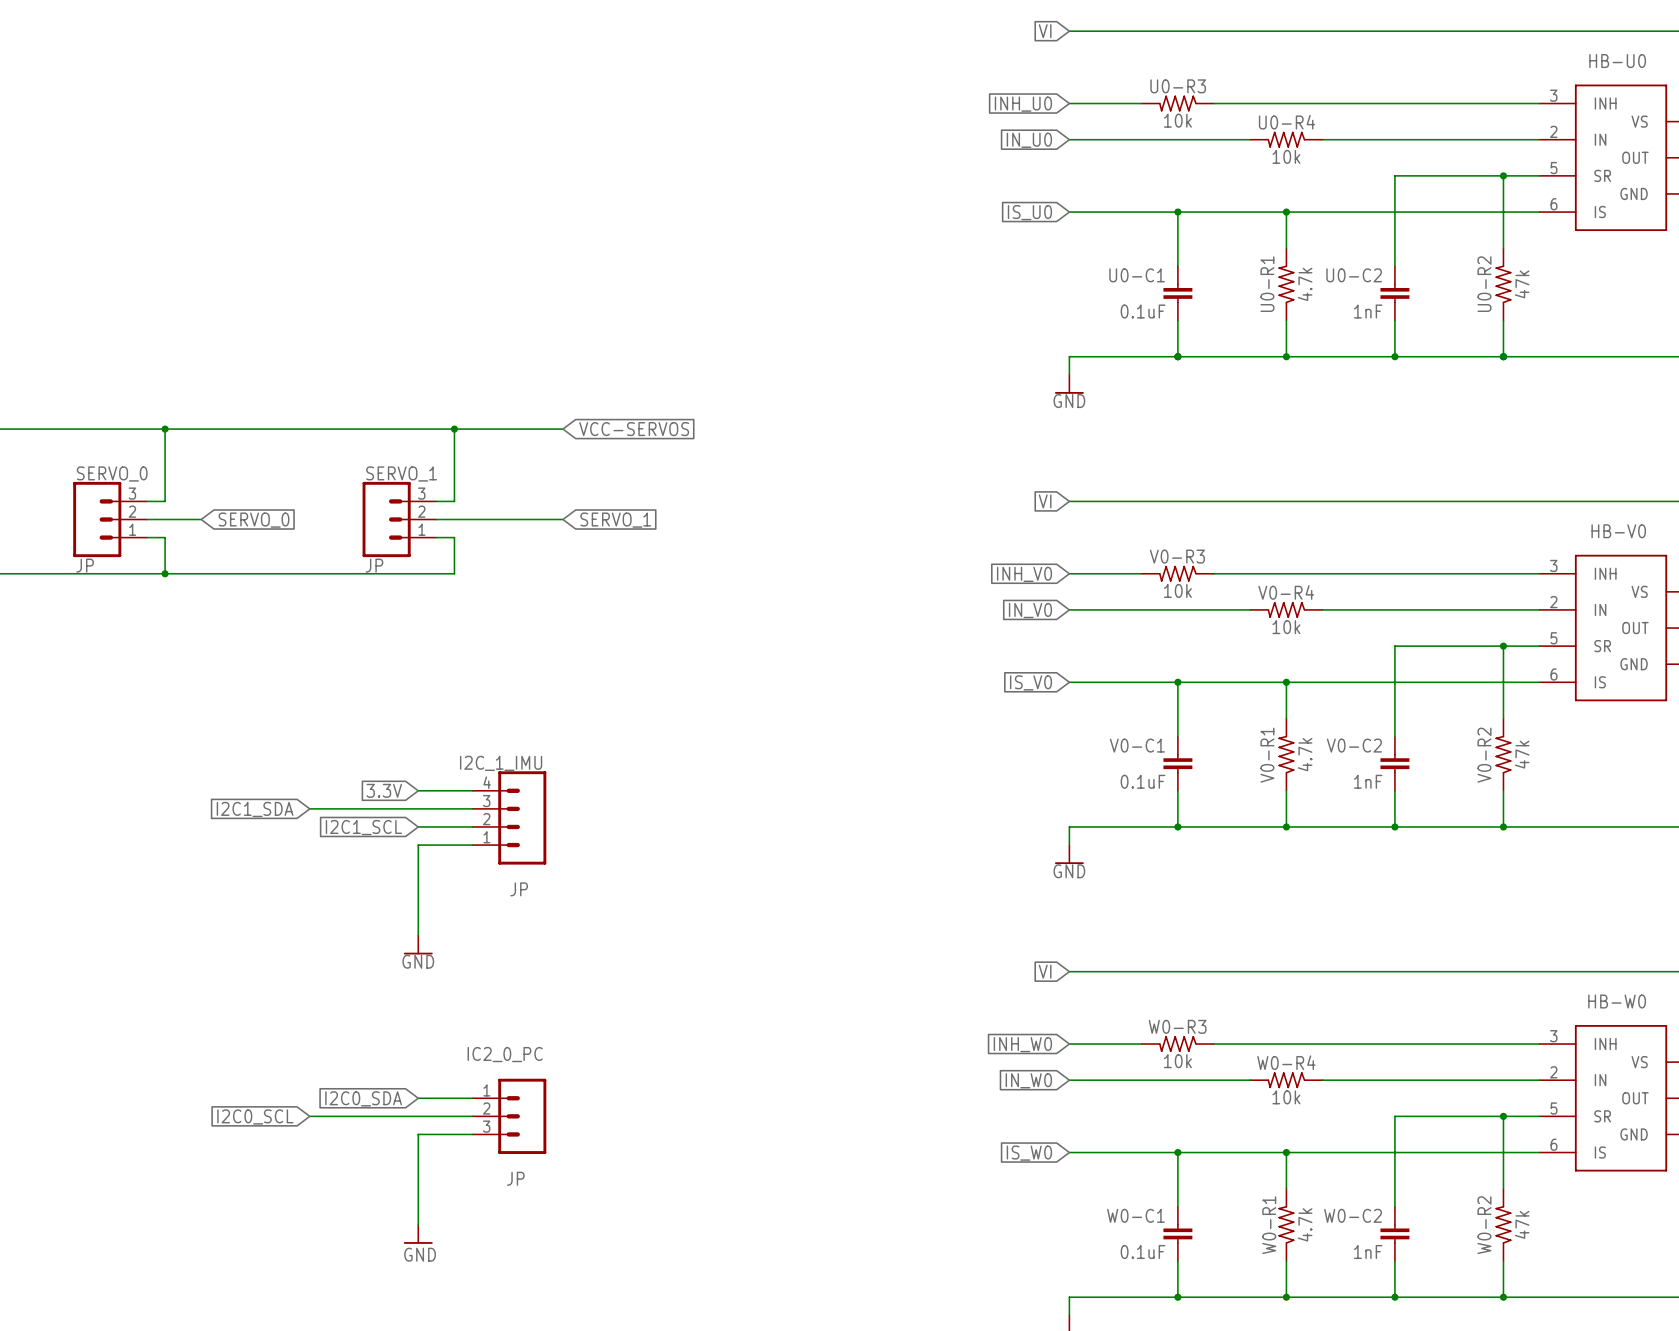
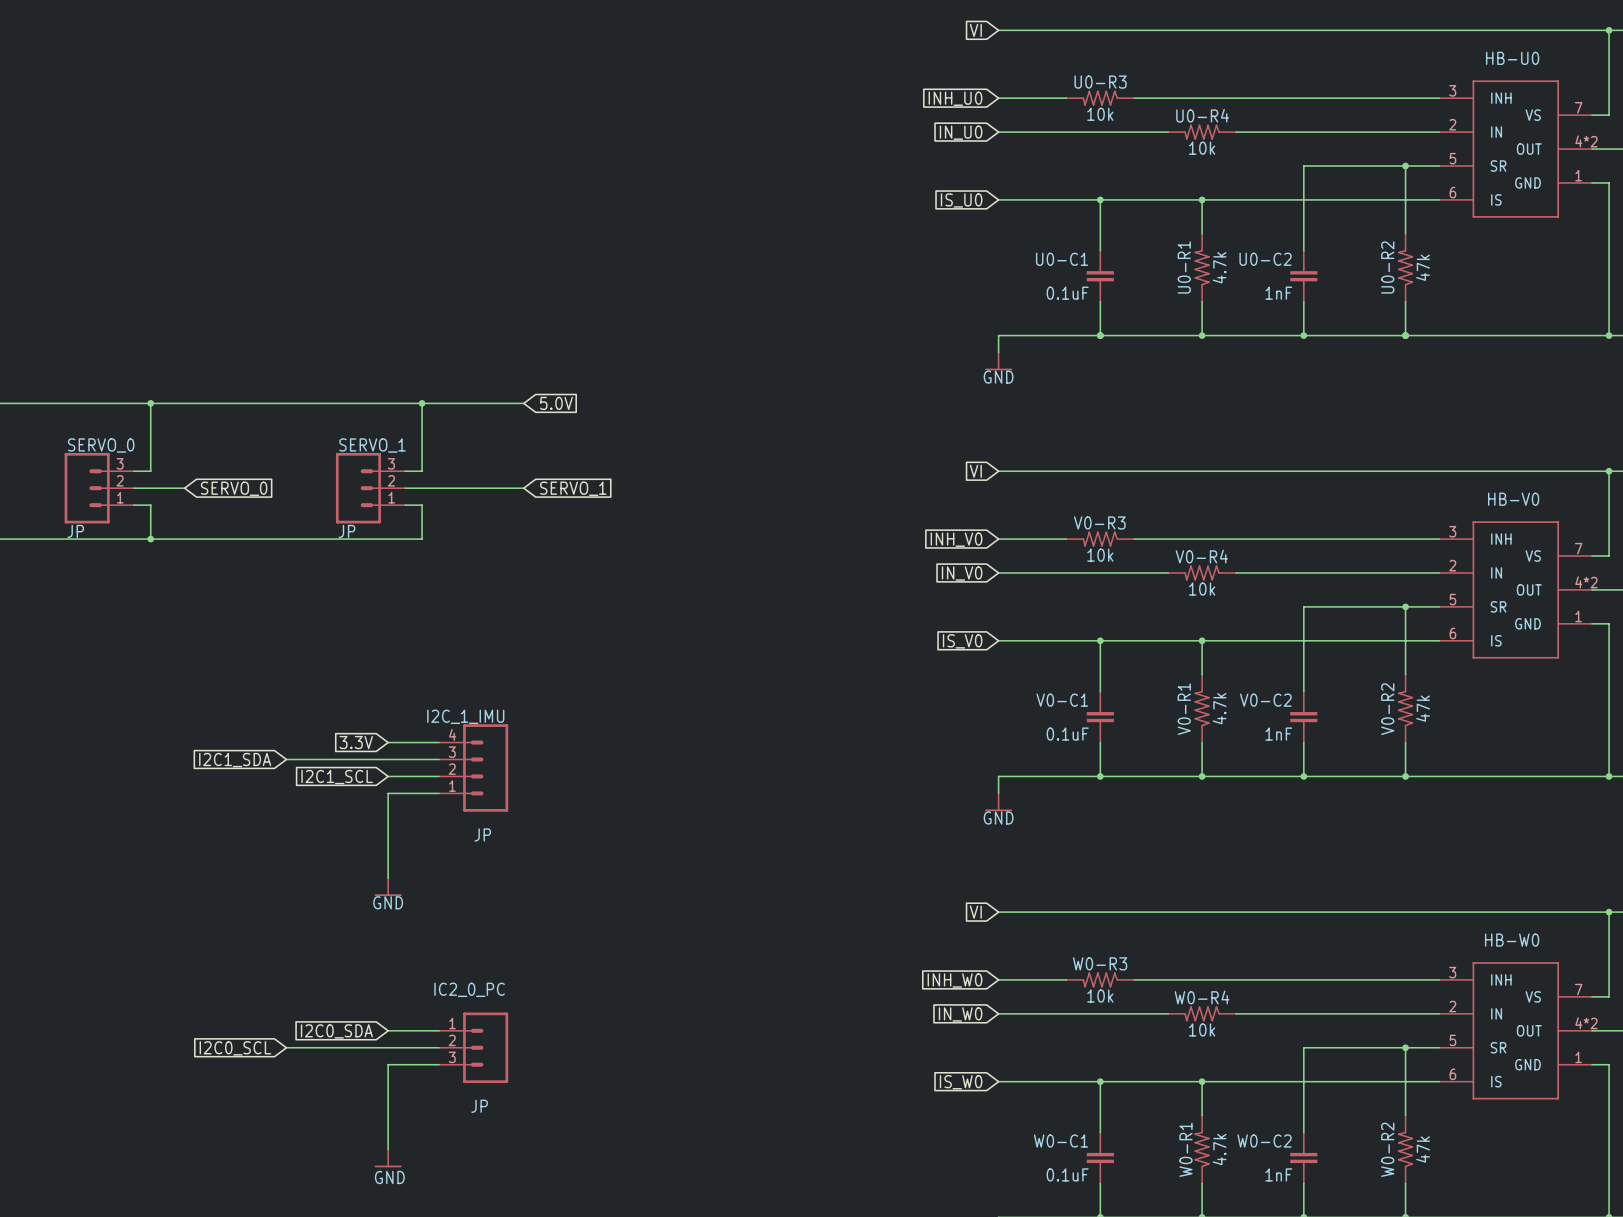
global label: VCC-SERVOS (634, 429) -> 5.0V (556, 403)

